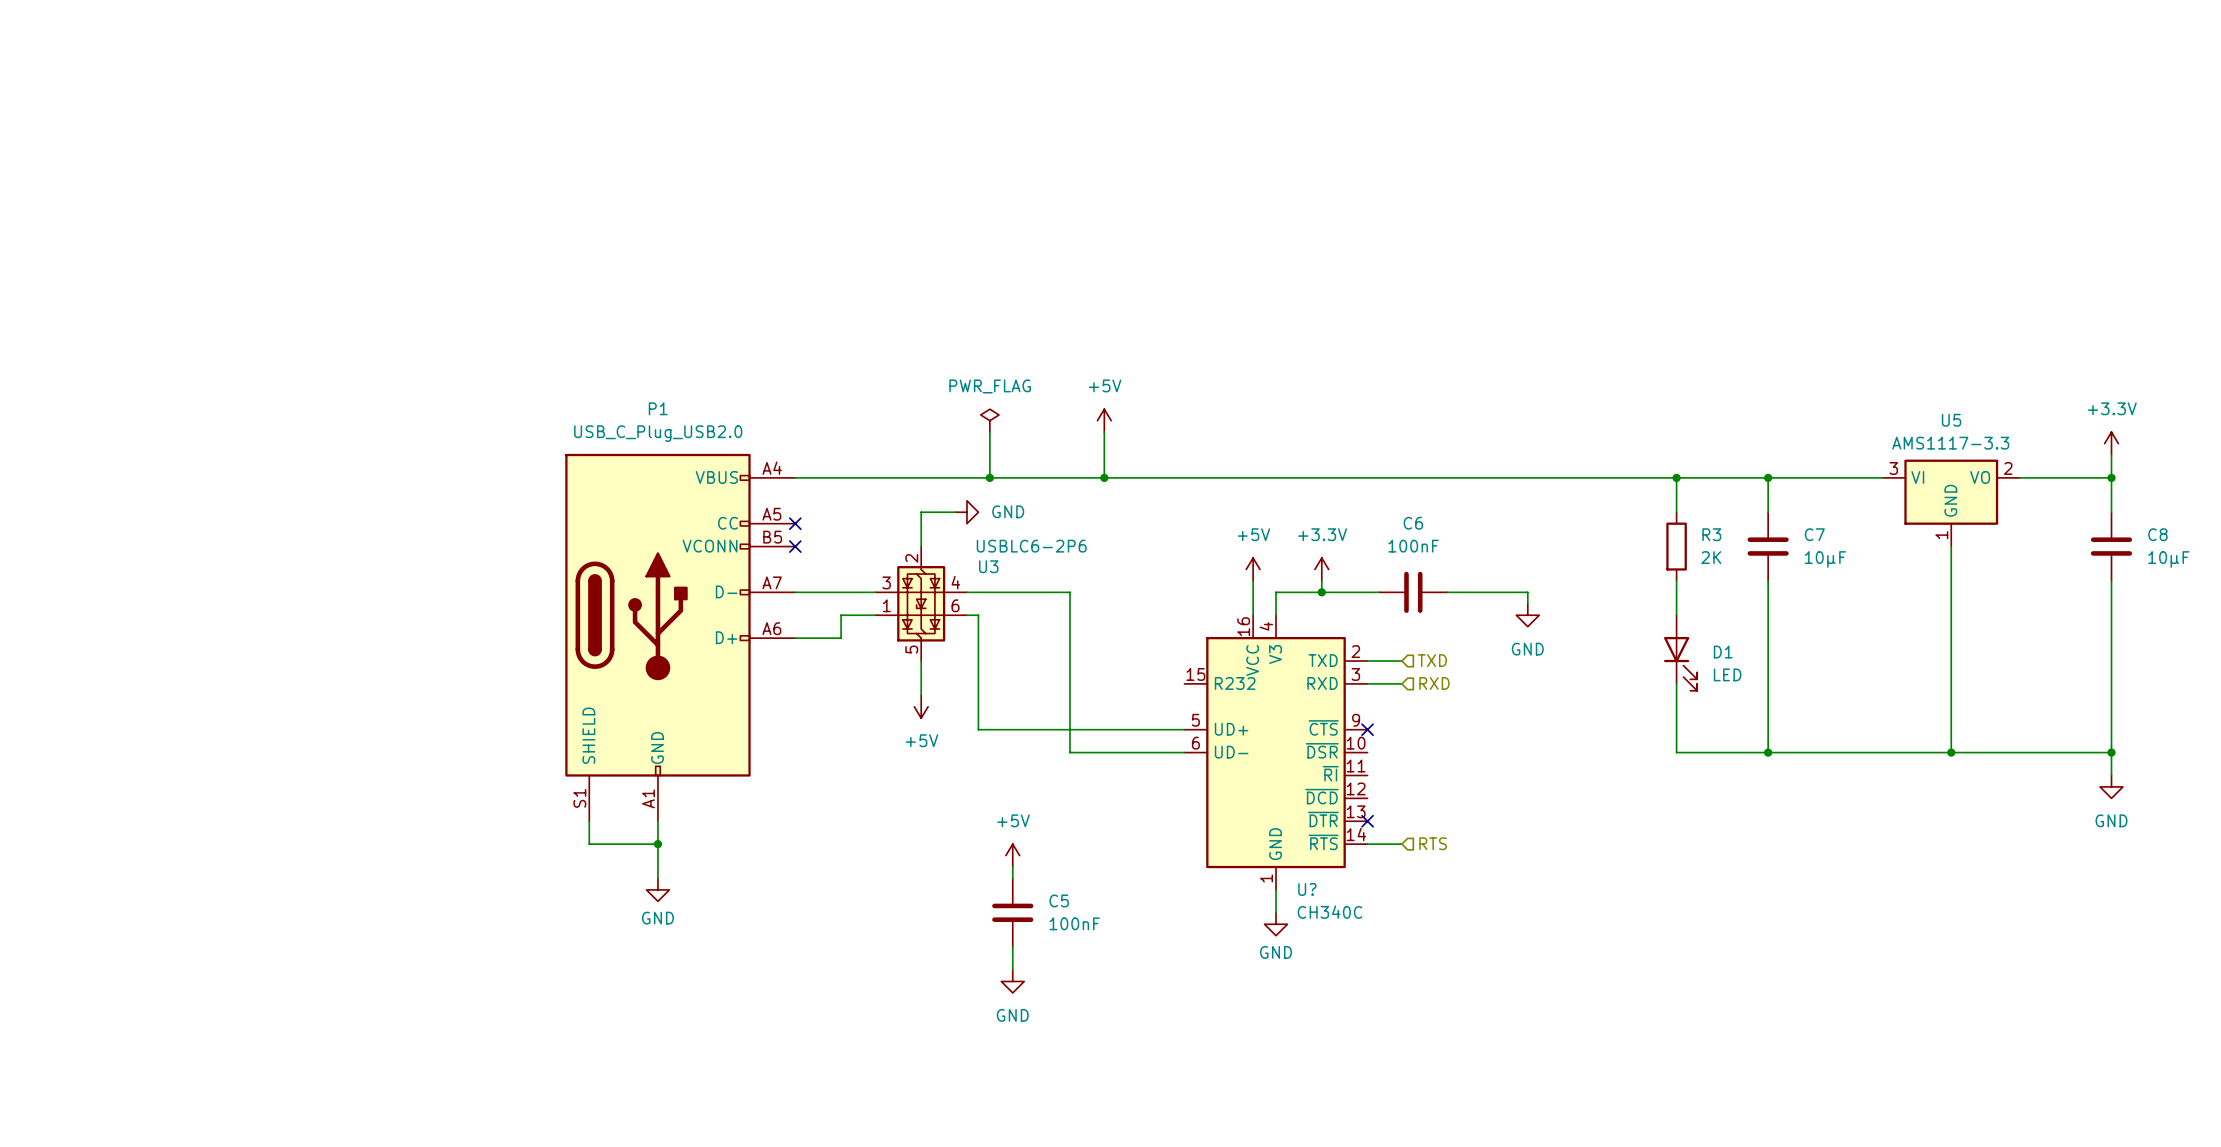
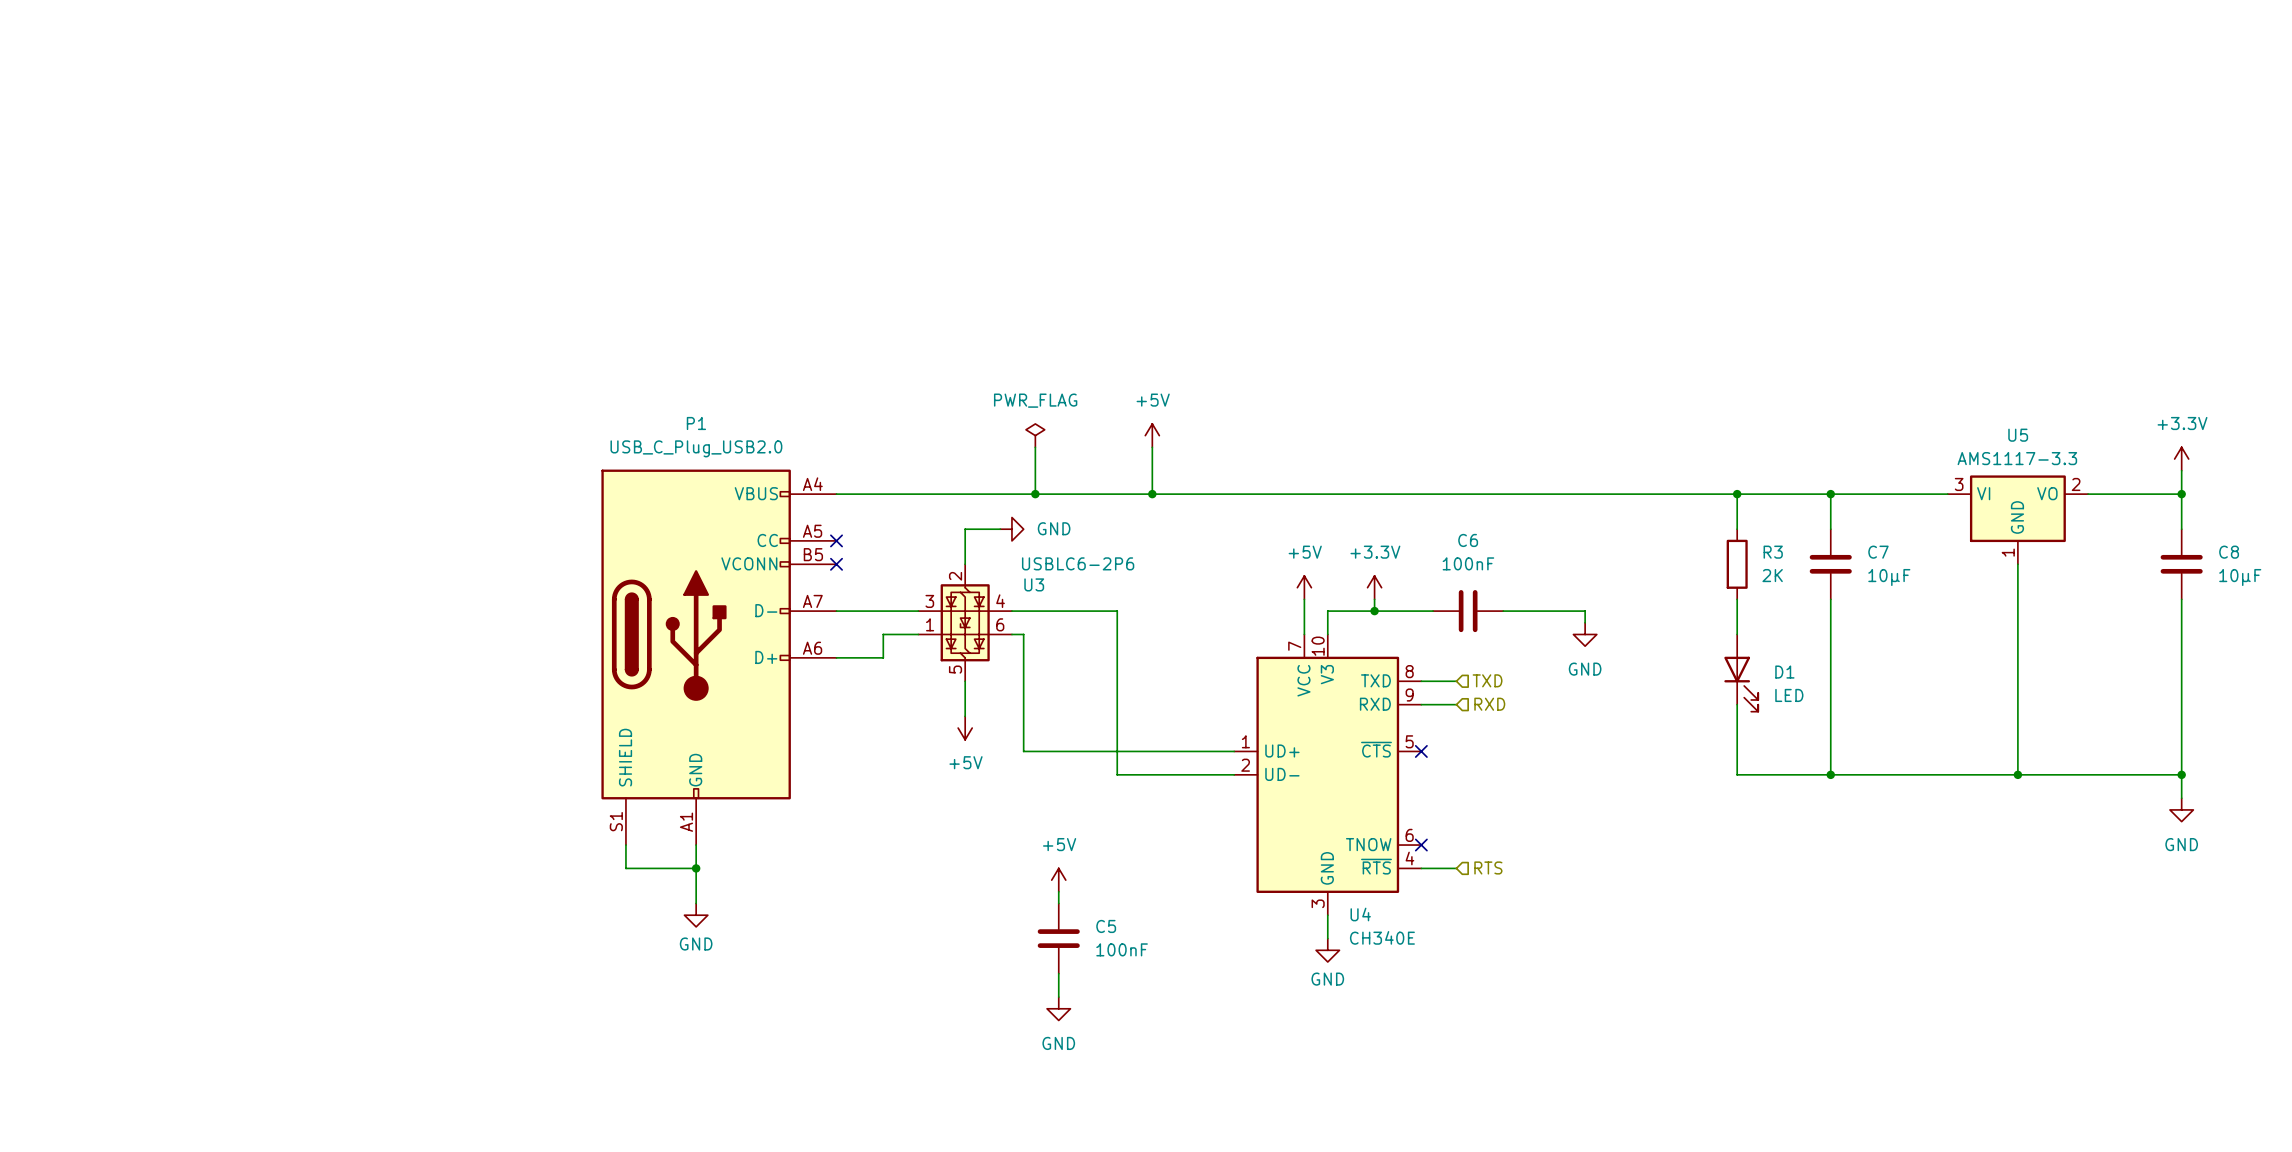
U?: CH340C (1276, 752) -> none
U4: none -> CH340E (1327, 774)

